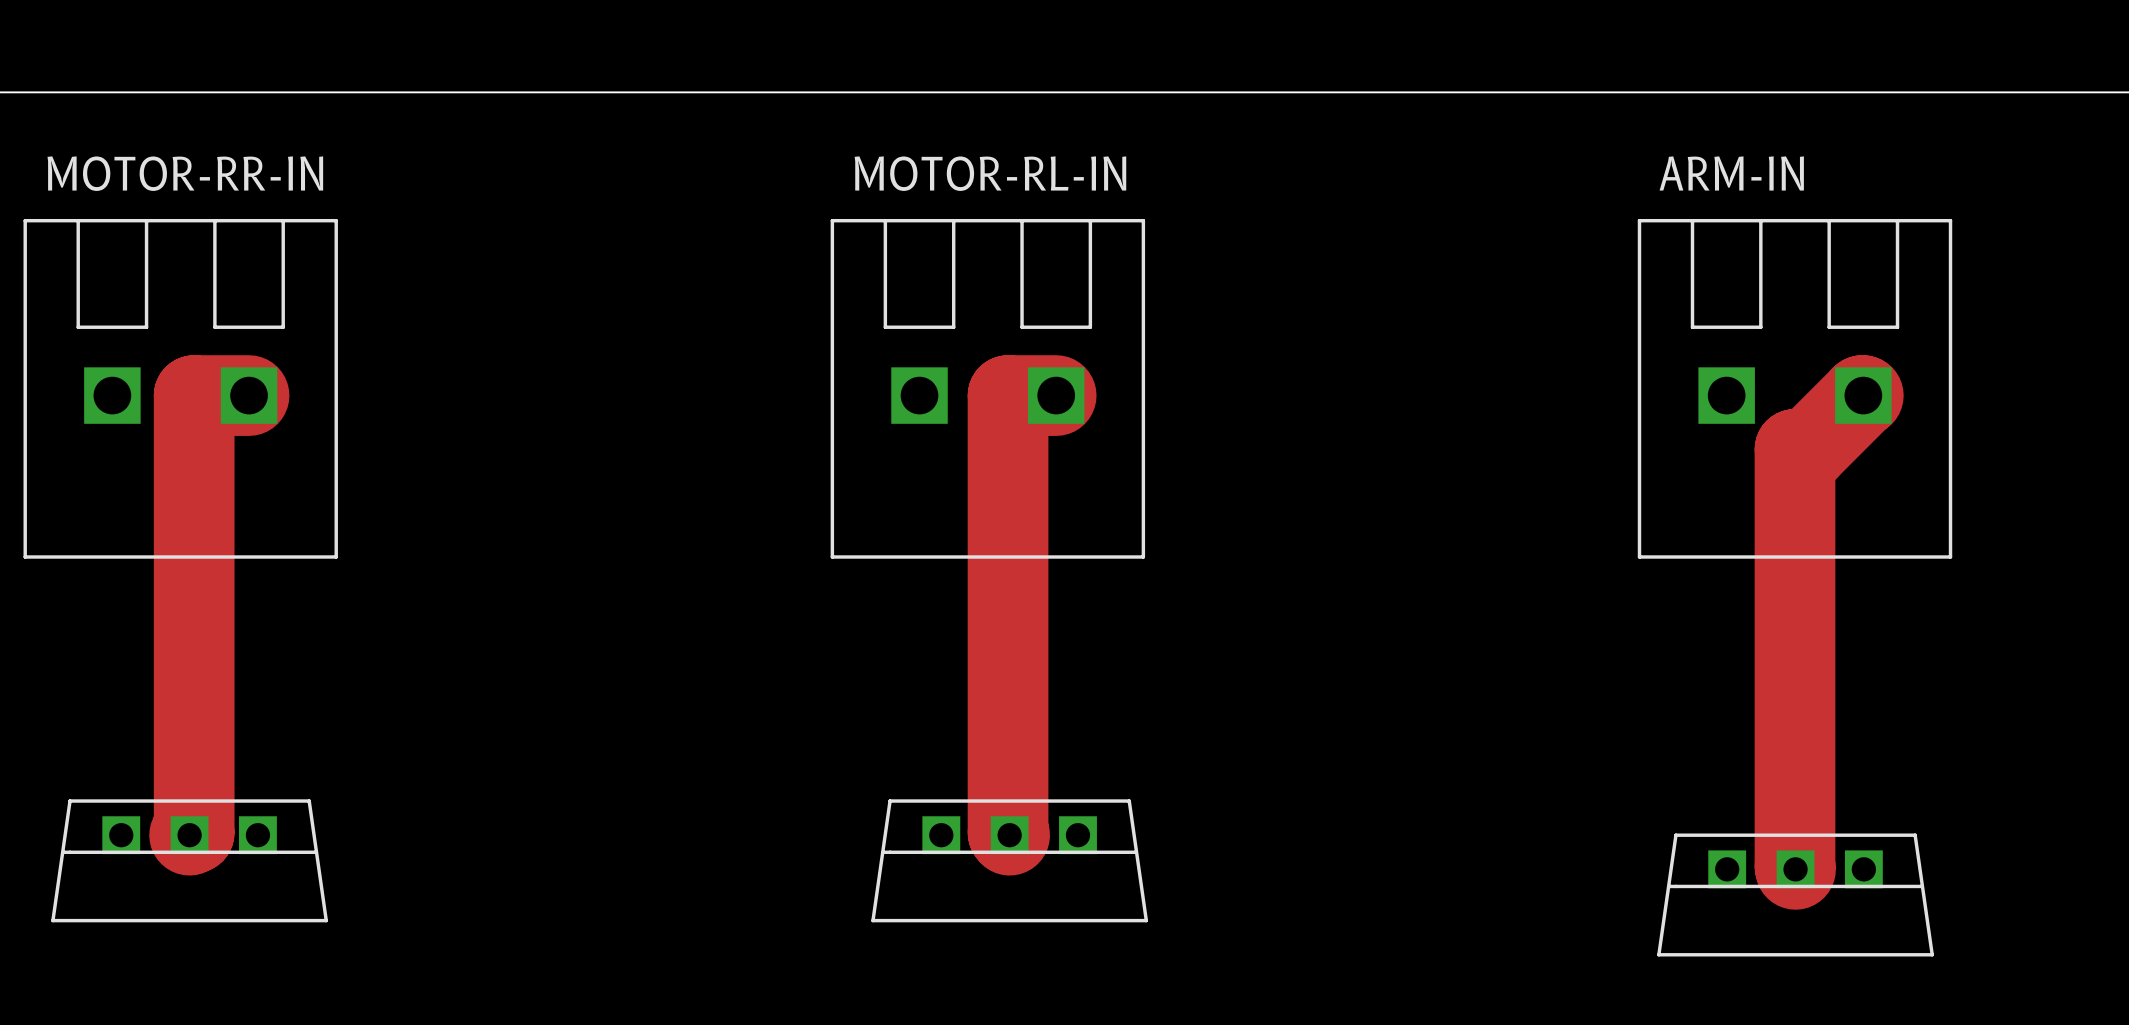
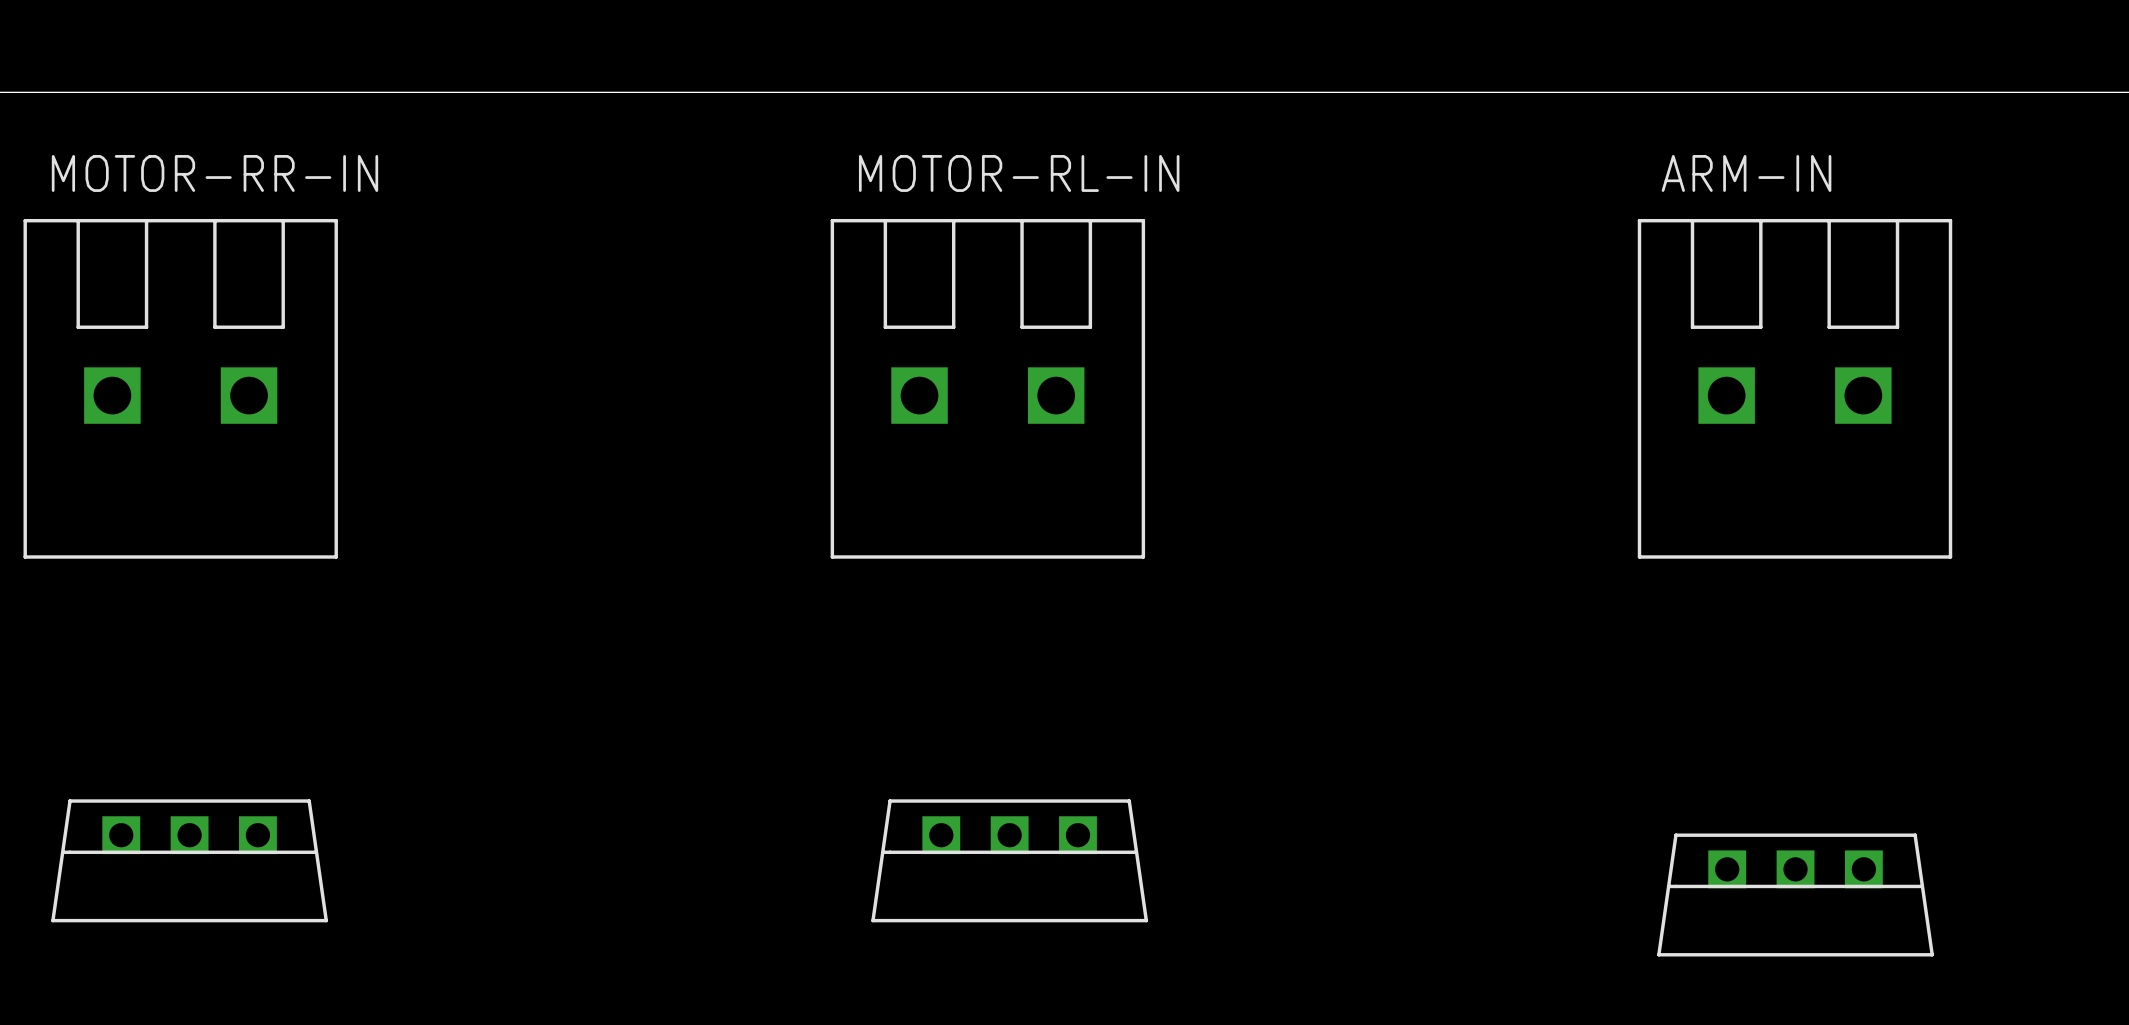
track: (249, 395) (194, 395) (194, 832) (189, 835) -> none
track: (1056, 395) (1008, 395) (1008, 832) (1009, 835) -> none
track: (1863, 395) (1808, 449) (1795, 449) (1795, 869) -> none

